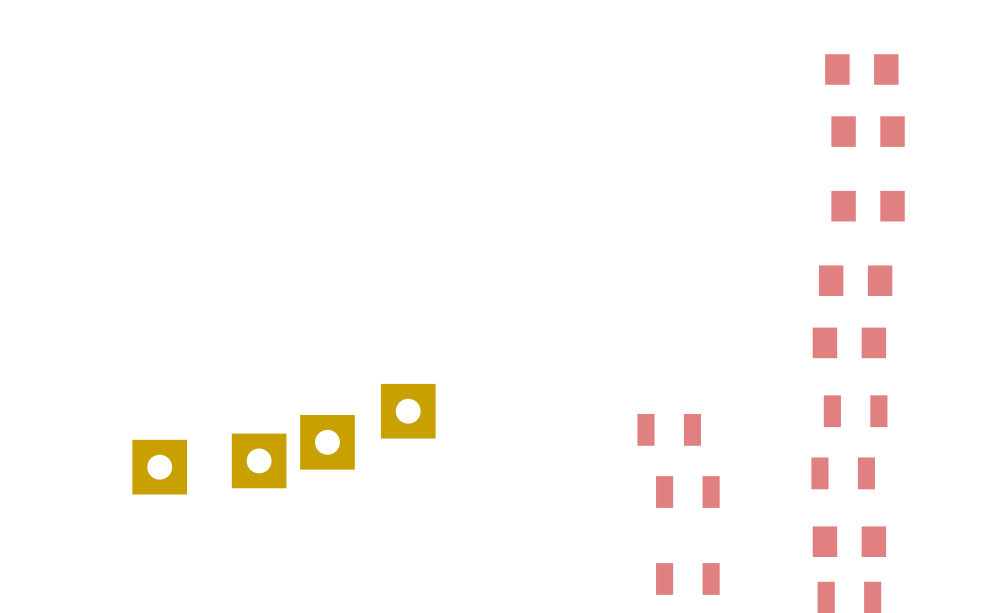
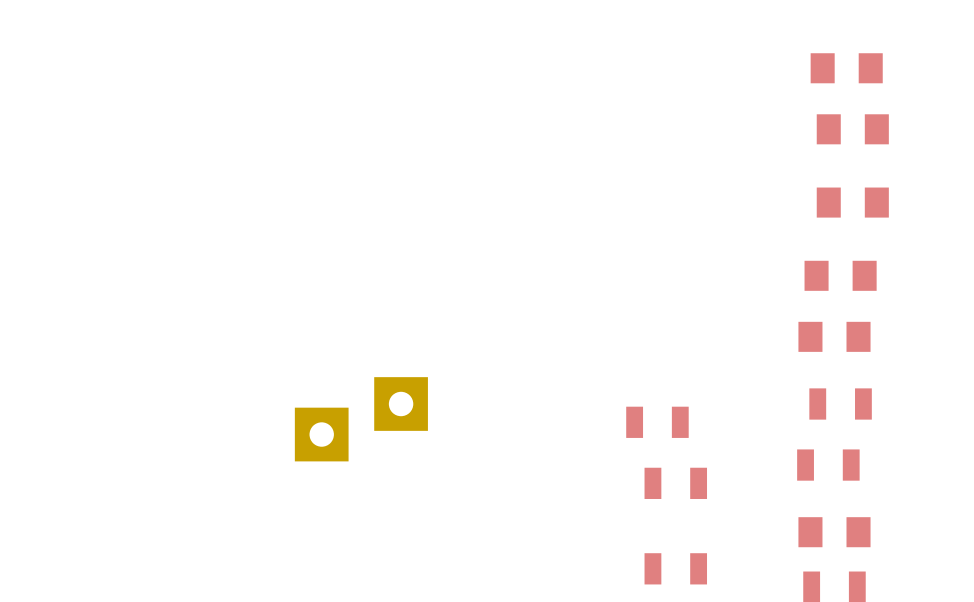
part: (259, 460) -> none
part: (159, 467) -> none

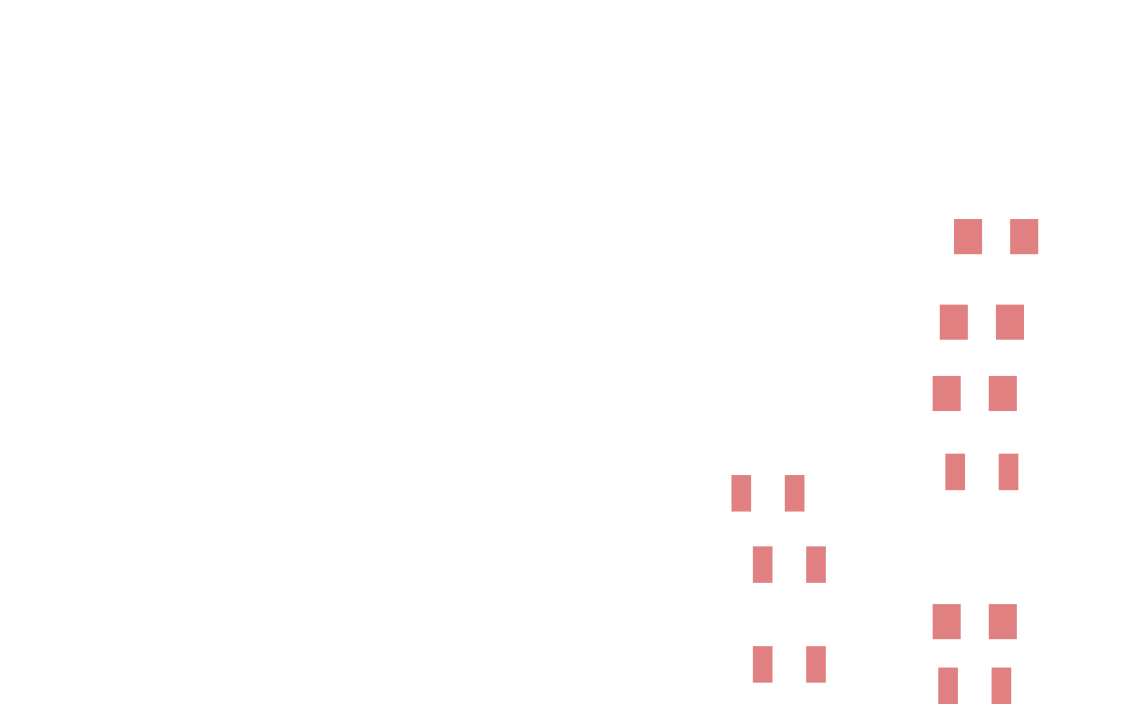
part: (846, 68) -> none
part: (852, 129) -> none
part: (401, 404) -> none
part: (321, 434) -> none
part: (828, 465) -> none

